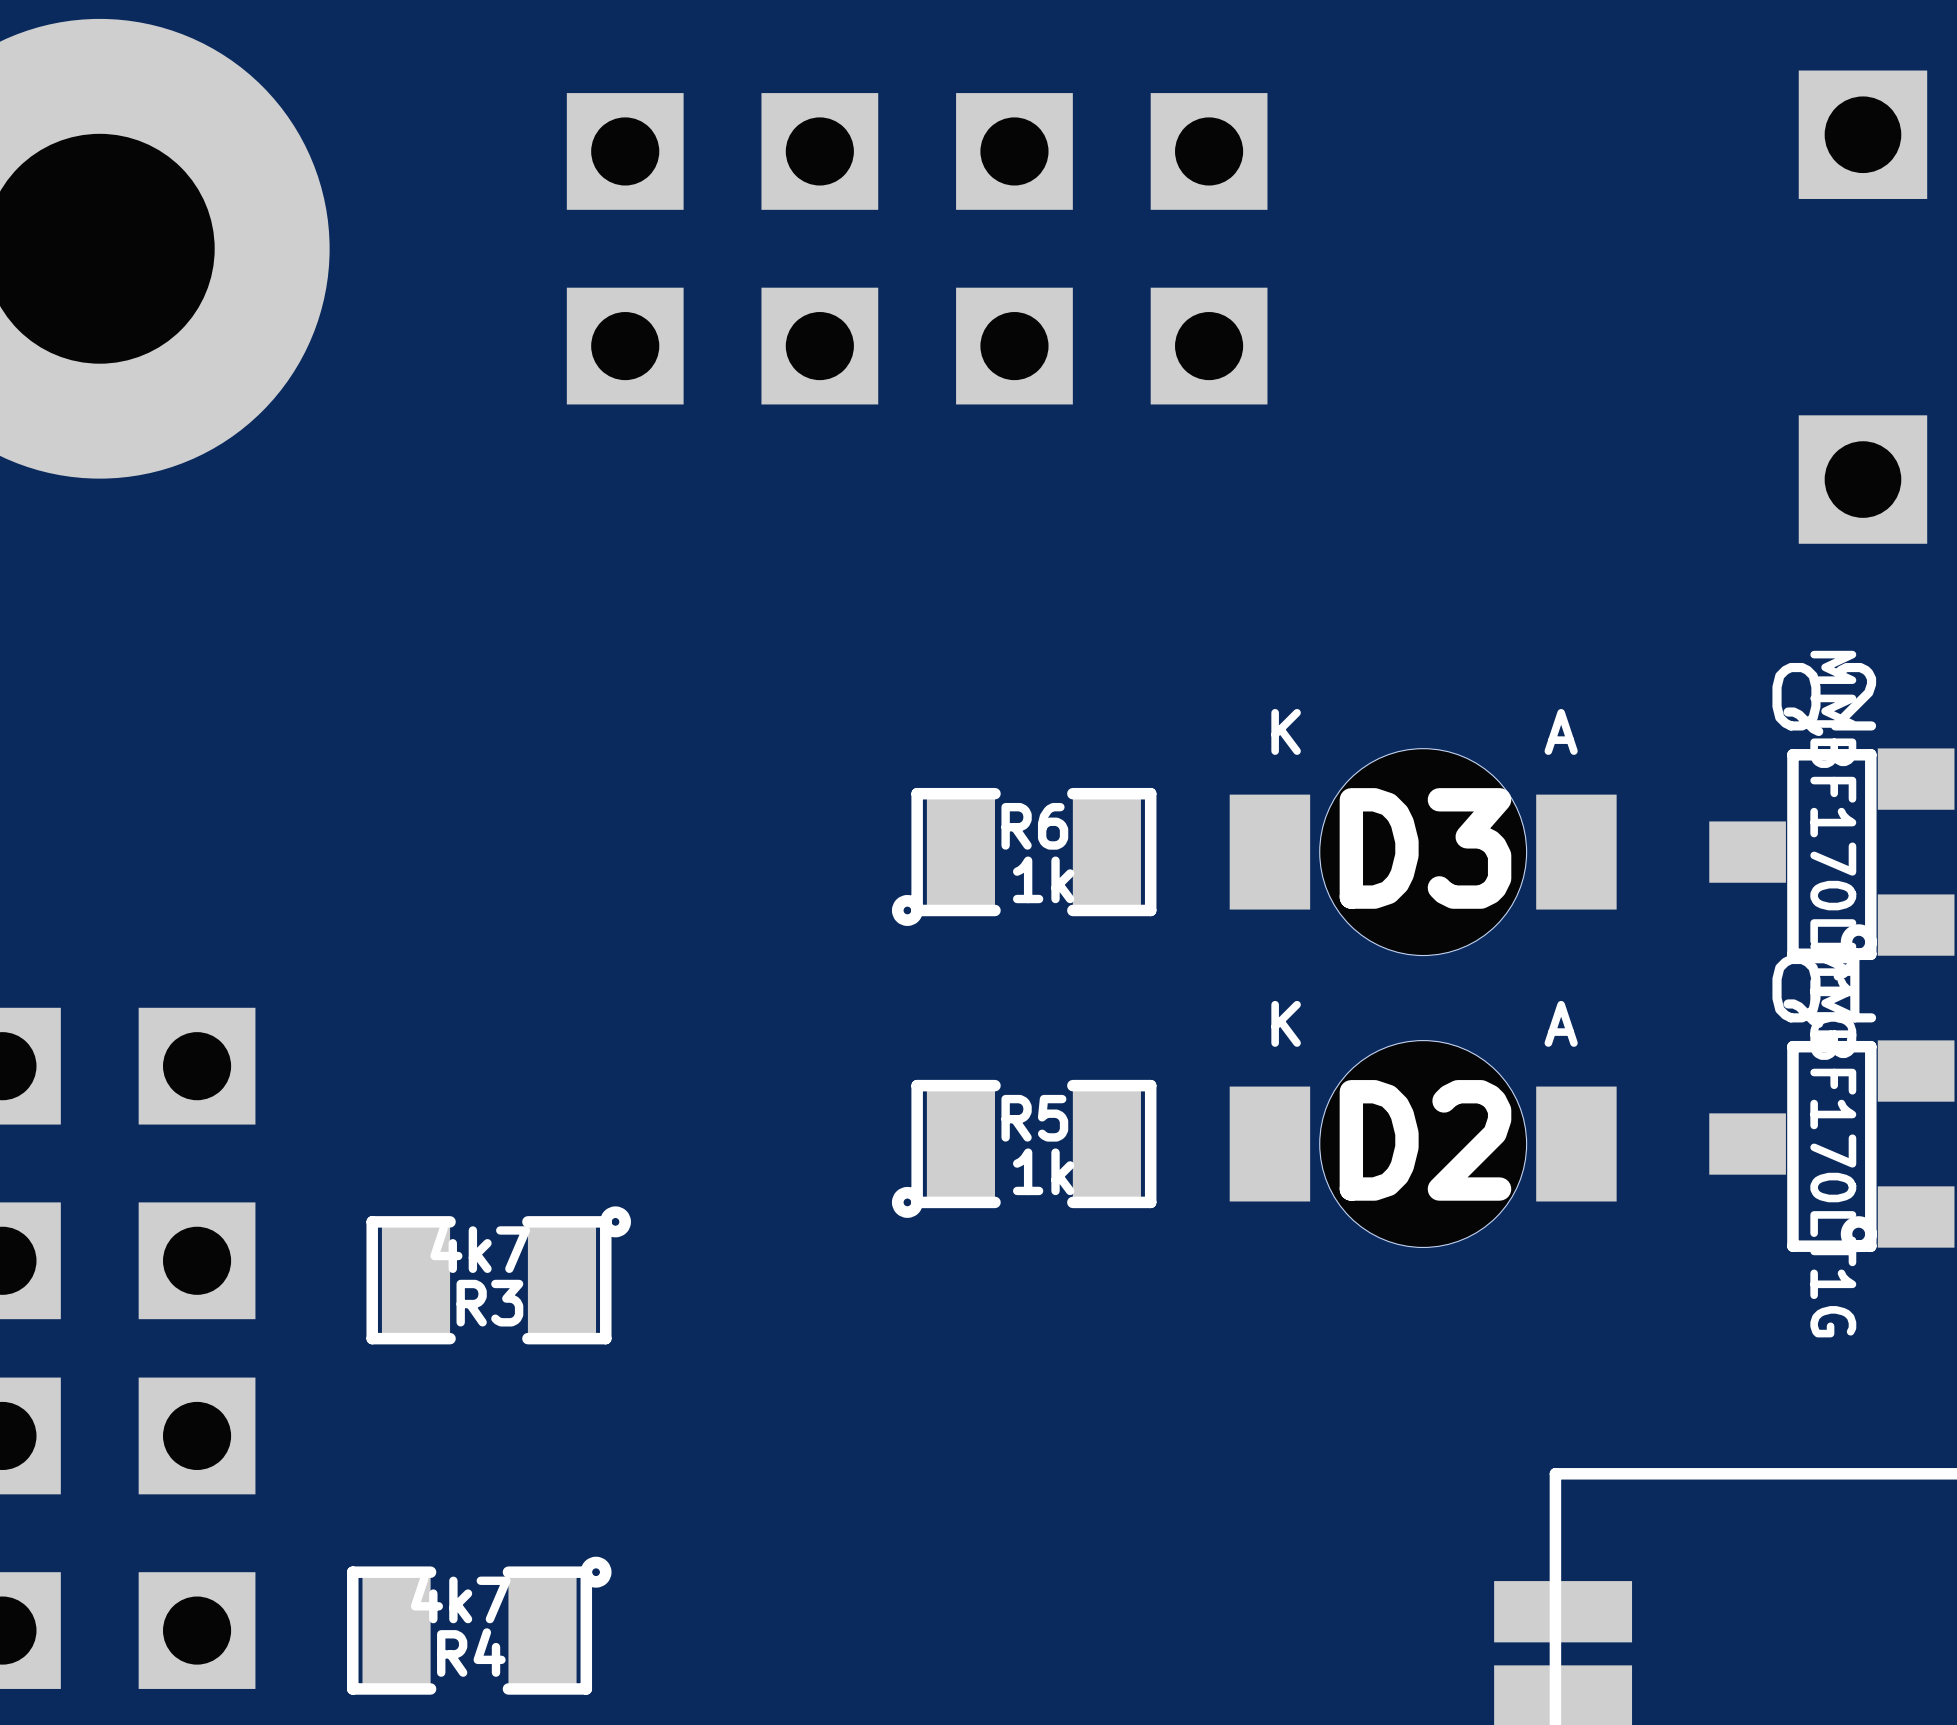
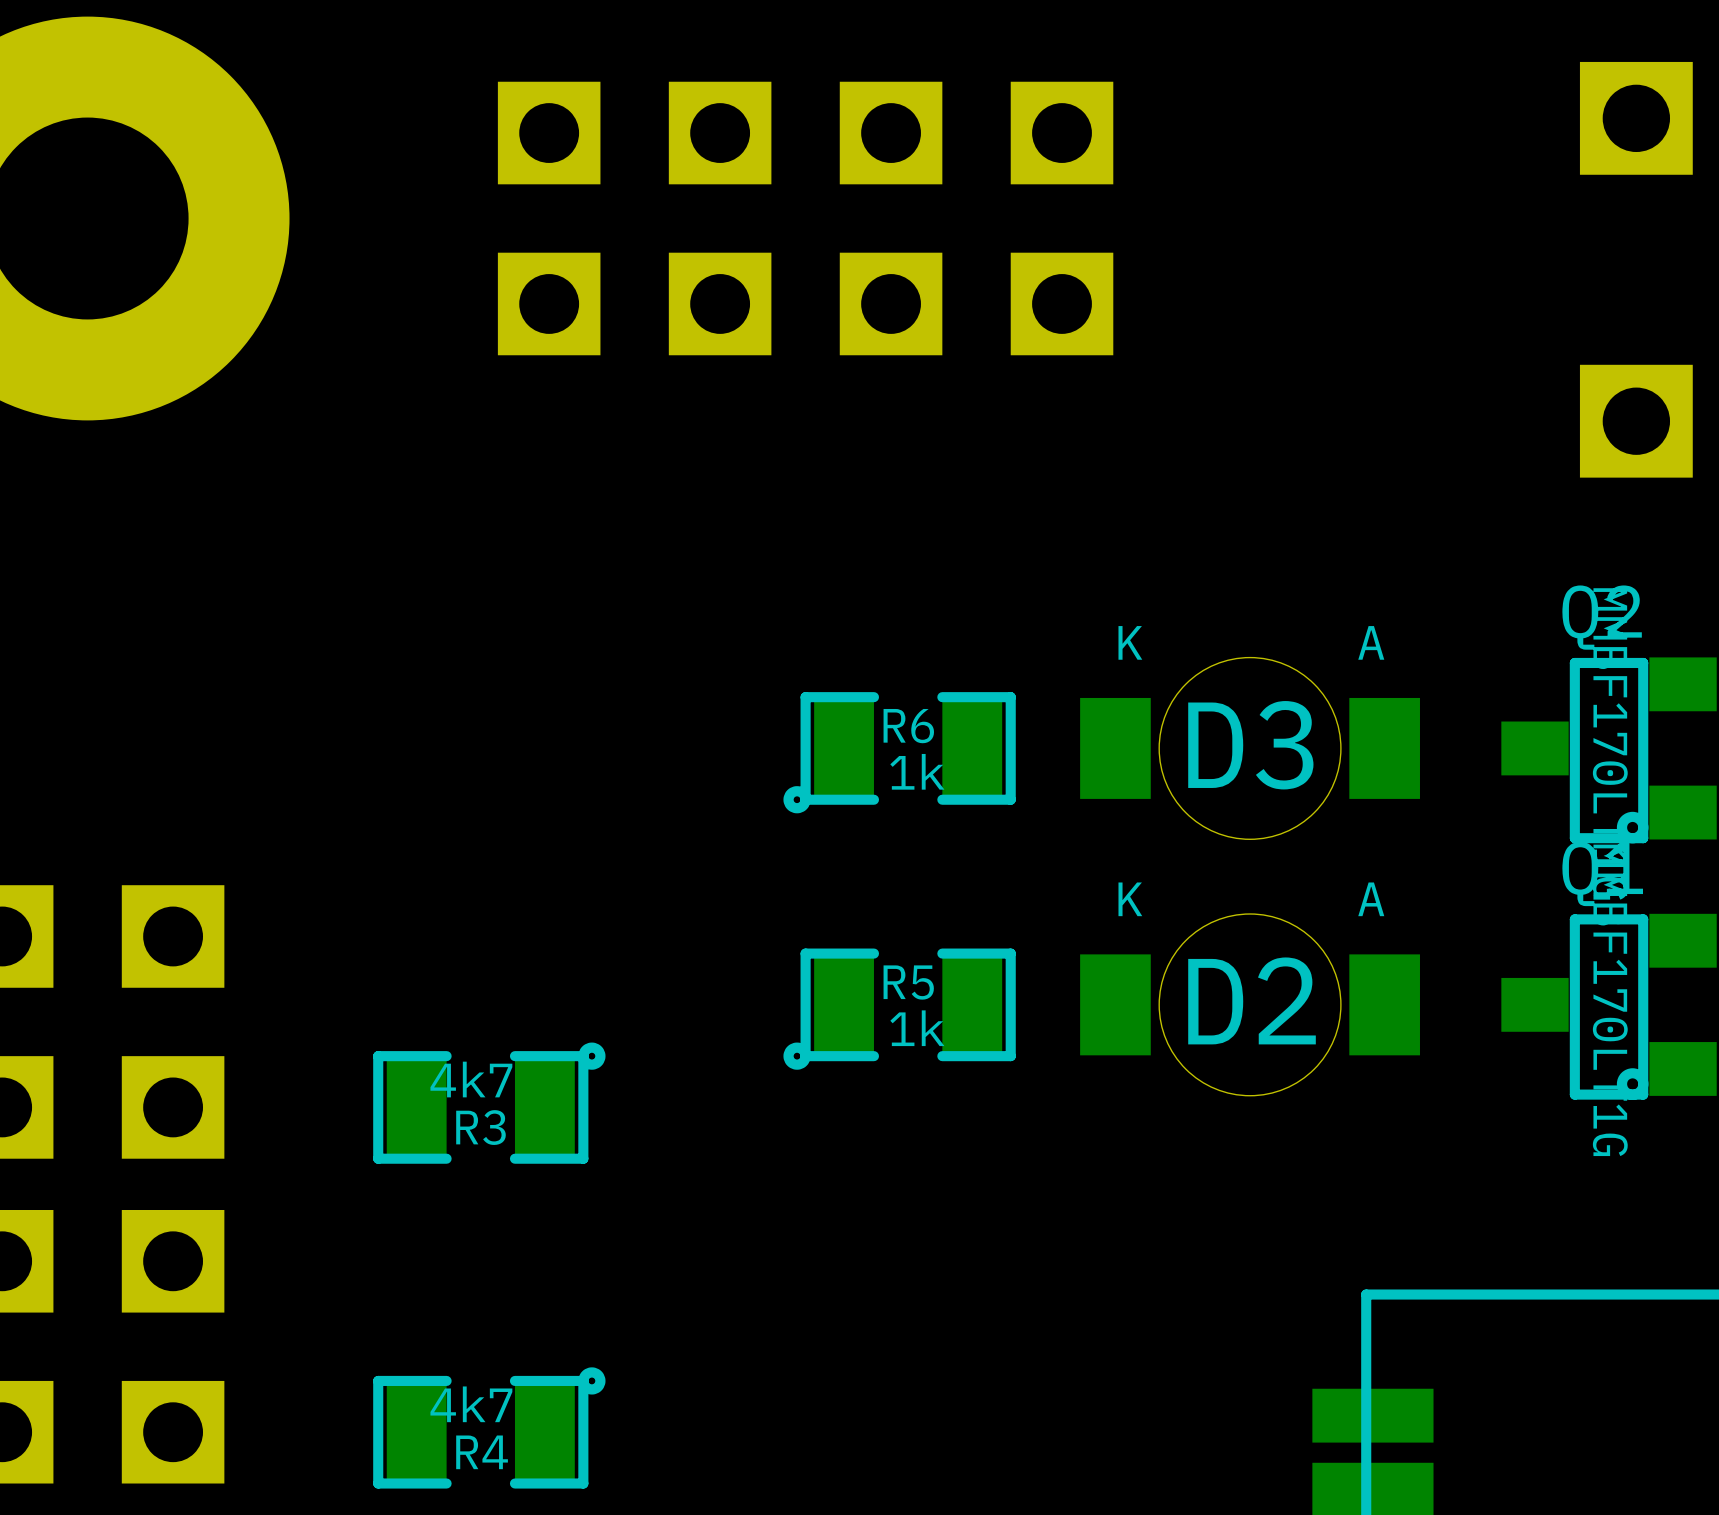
R3 position: (498, 1275) -> (489, 1103)
R4 position: (479, 1625) -> (489, 1427)

